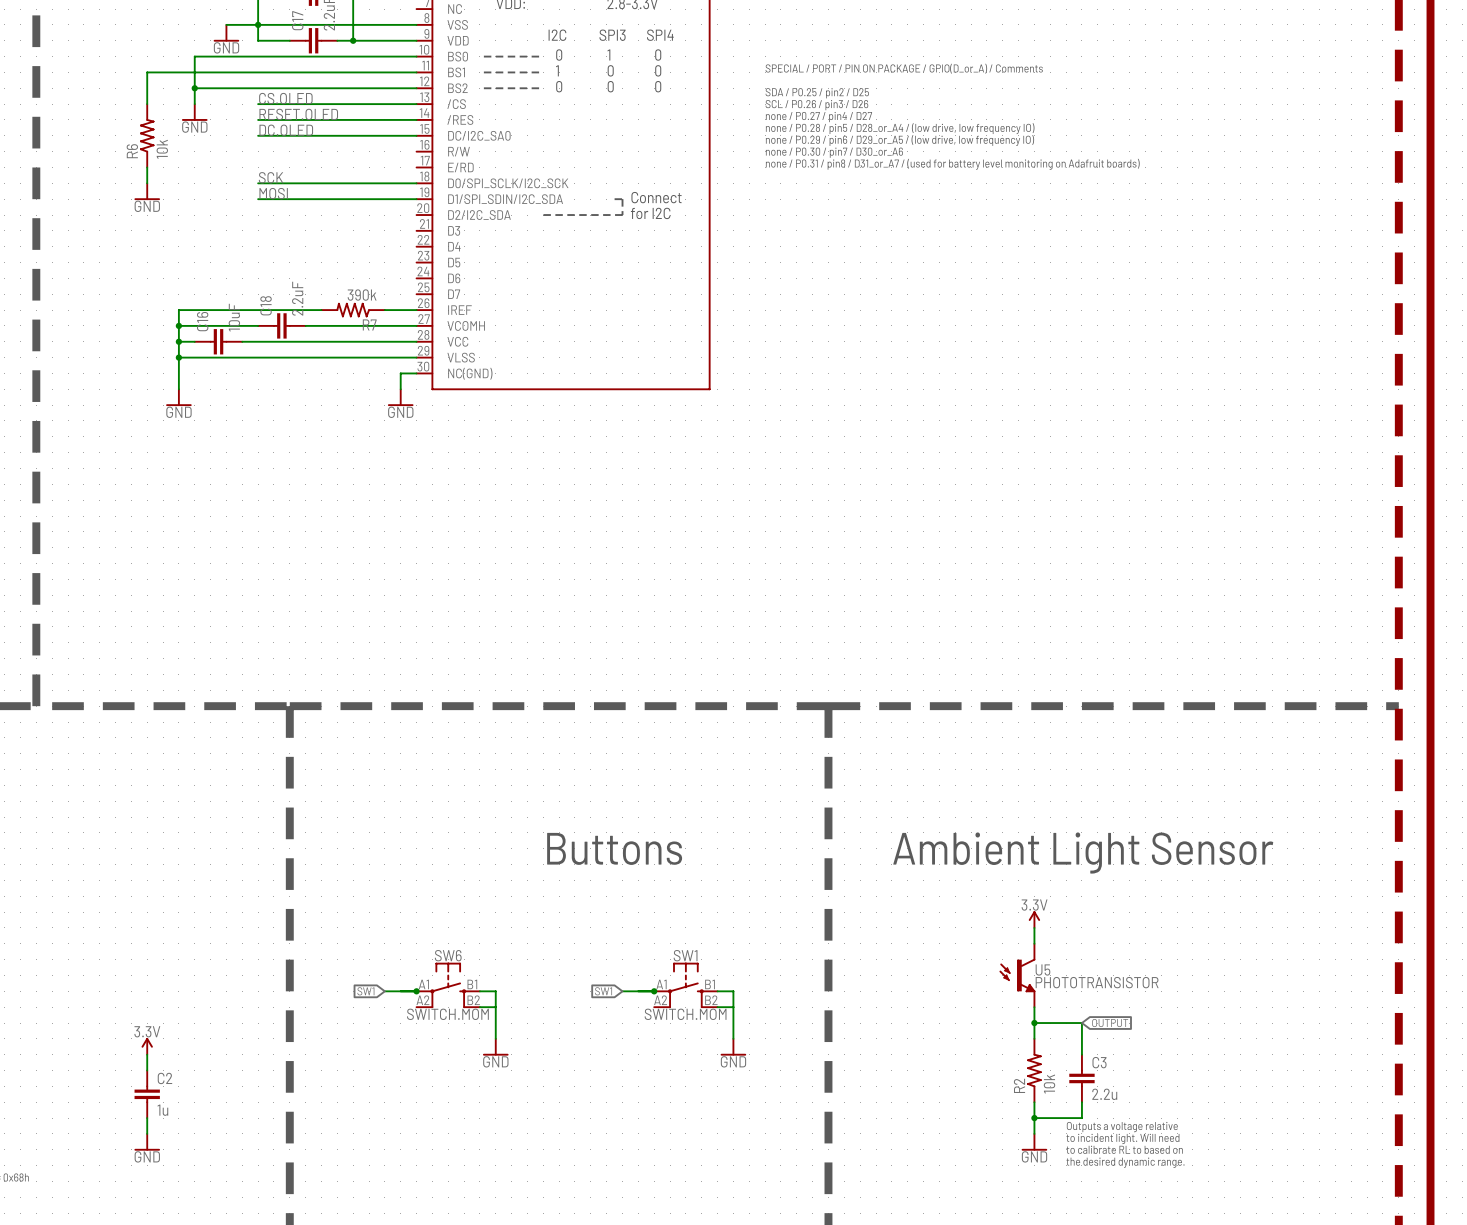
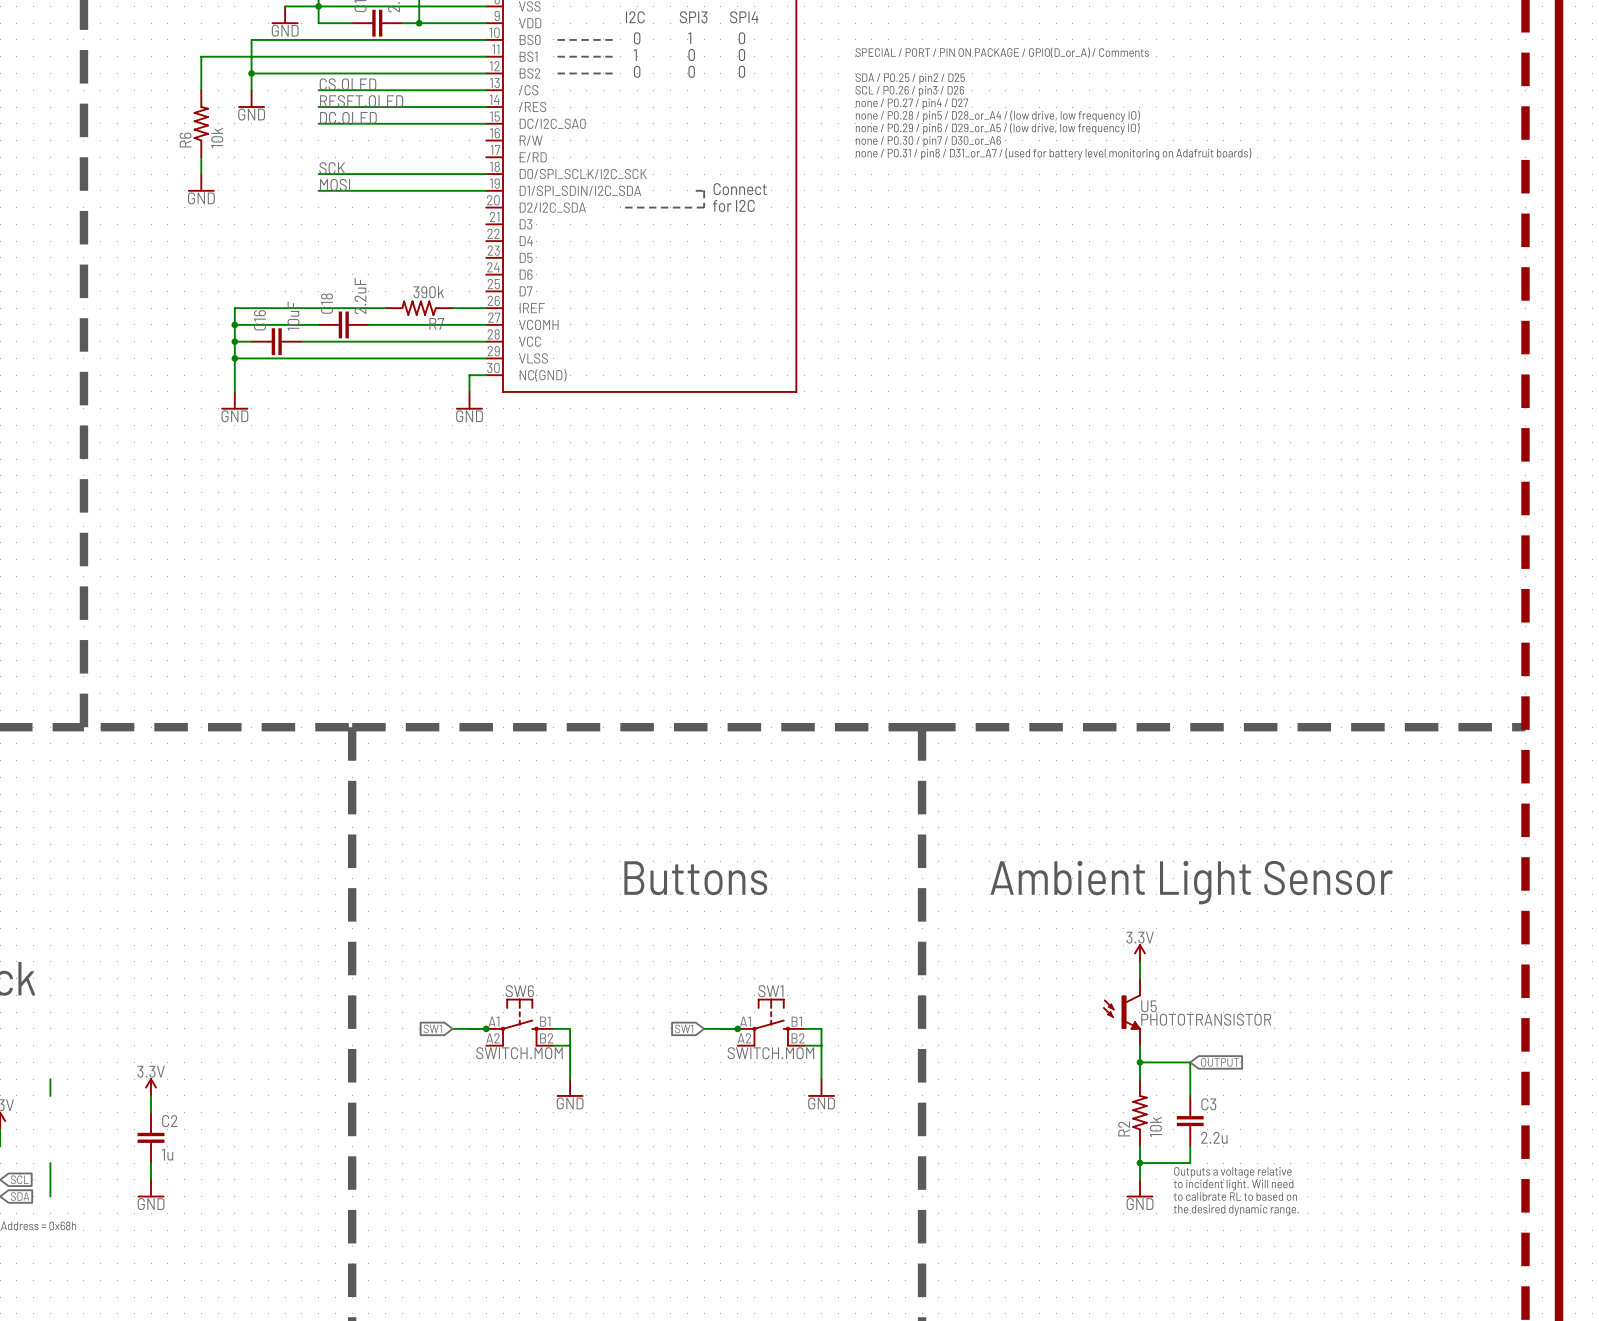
wire: none -> (50, 1079) (50, 1095)
power symbol position: 3.3V (147, 1046) -> 3.3V (151, 1087)
wire: (147, 1054) (147, 1070) -> (151, 1095) (151, 1112)
C2 position: (147, 1094) -> (151, 1137)
wire: none -> (50, 1163) (50, 1196)
wire: (147, 1118) (147, 1133) -> (151, 1163) (151, 1179)
power symbol position: GND (147, 1142) -> GND (151, 1188)

